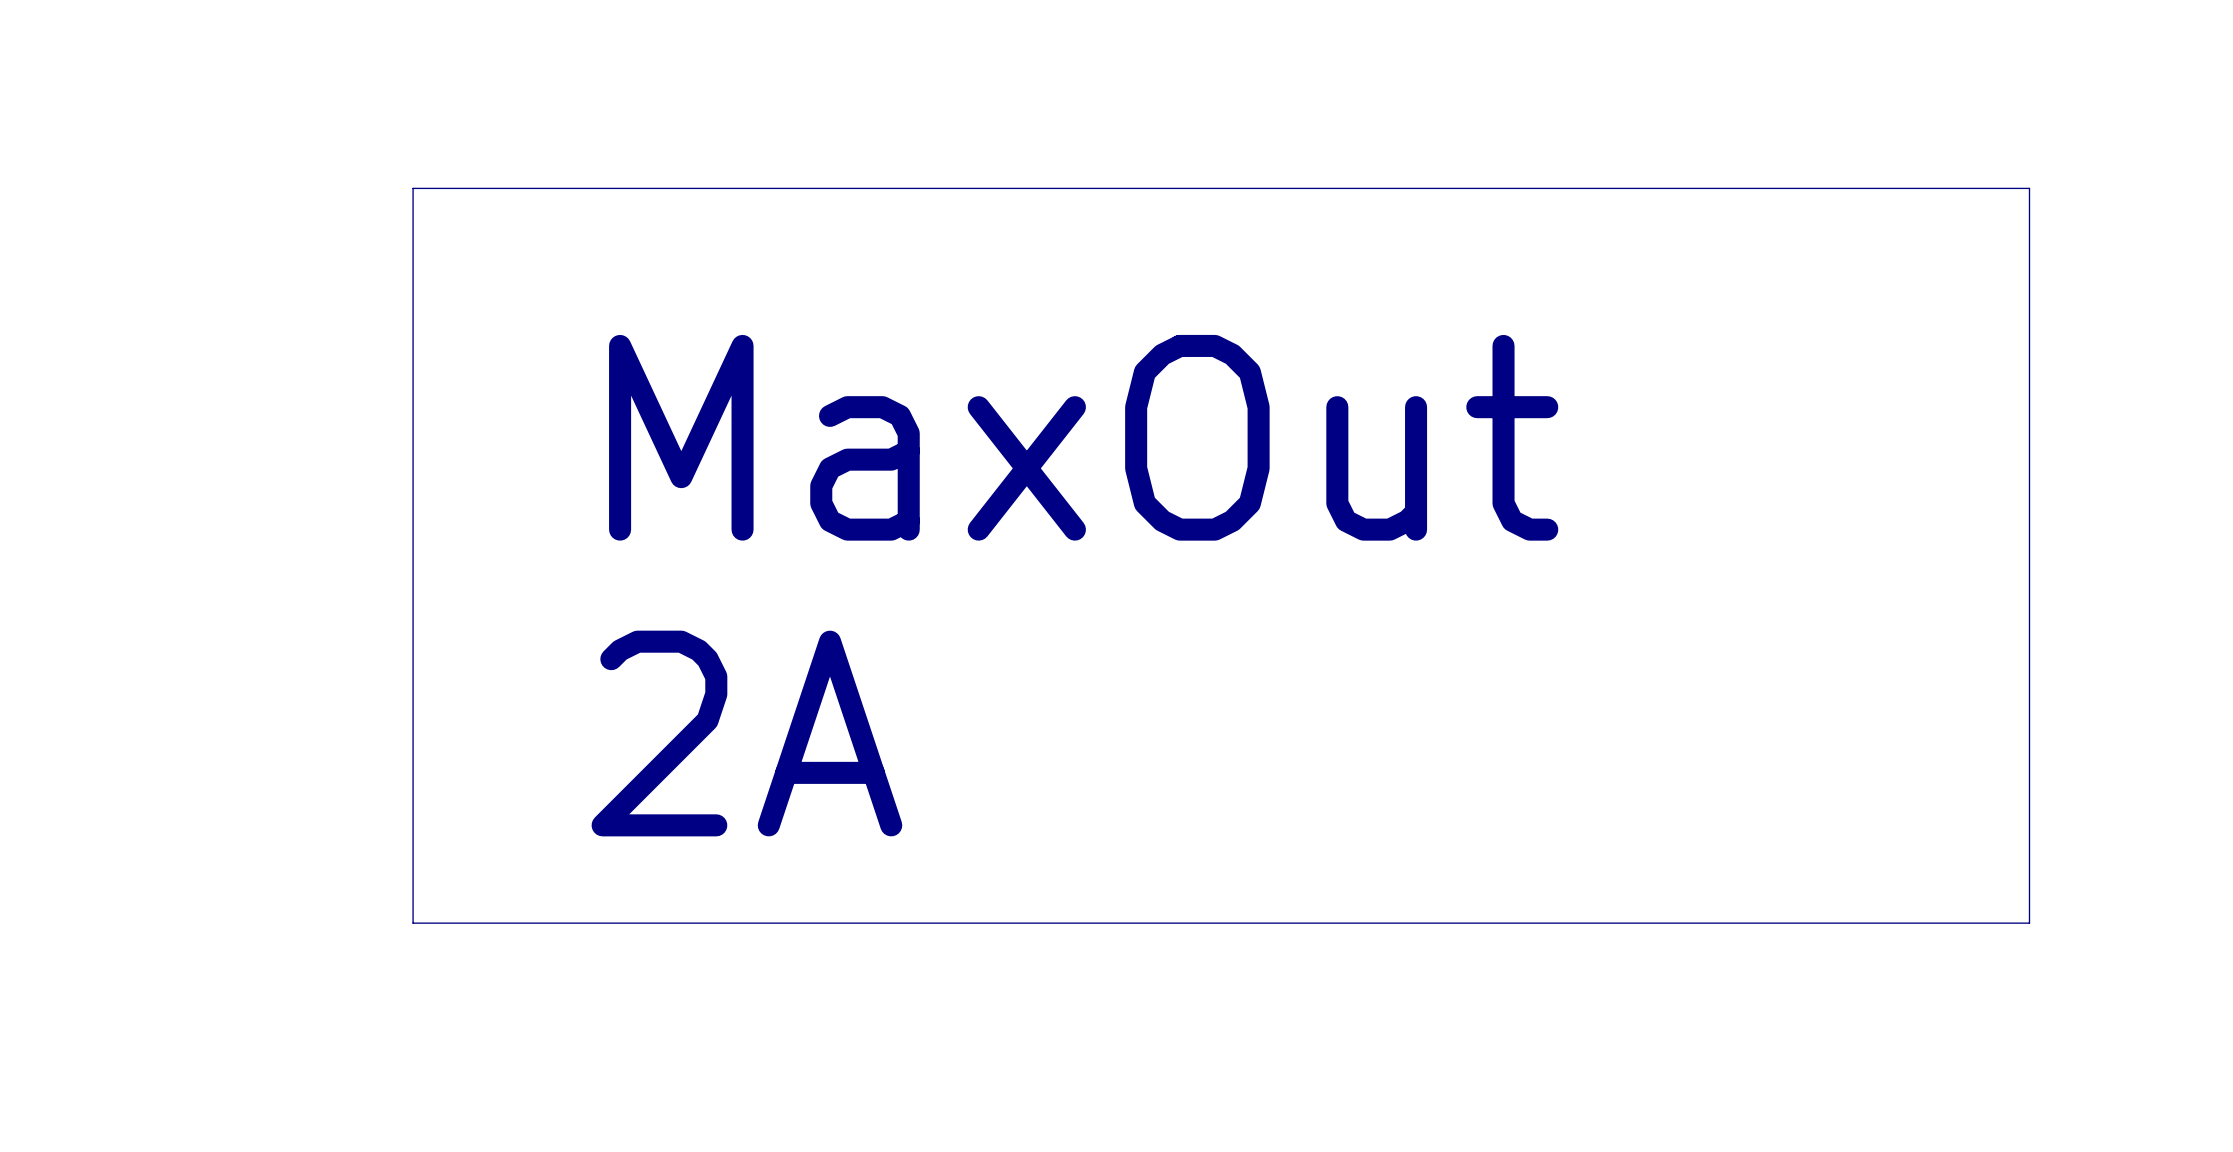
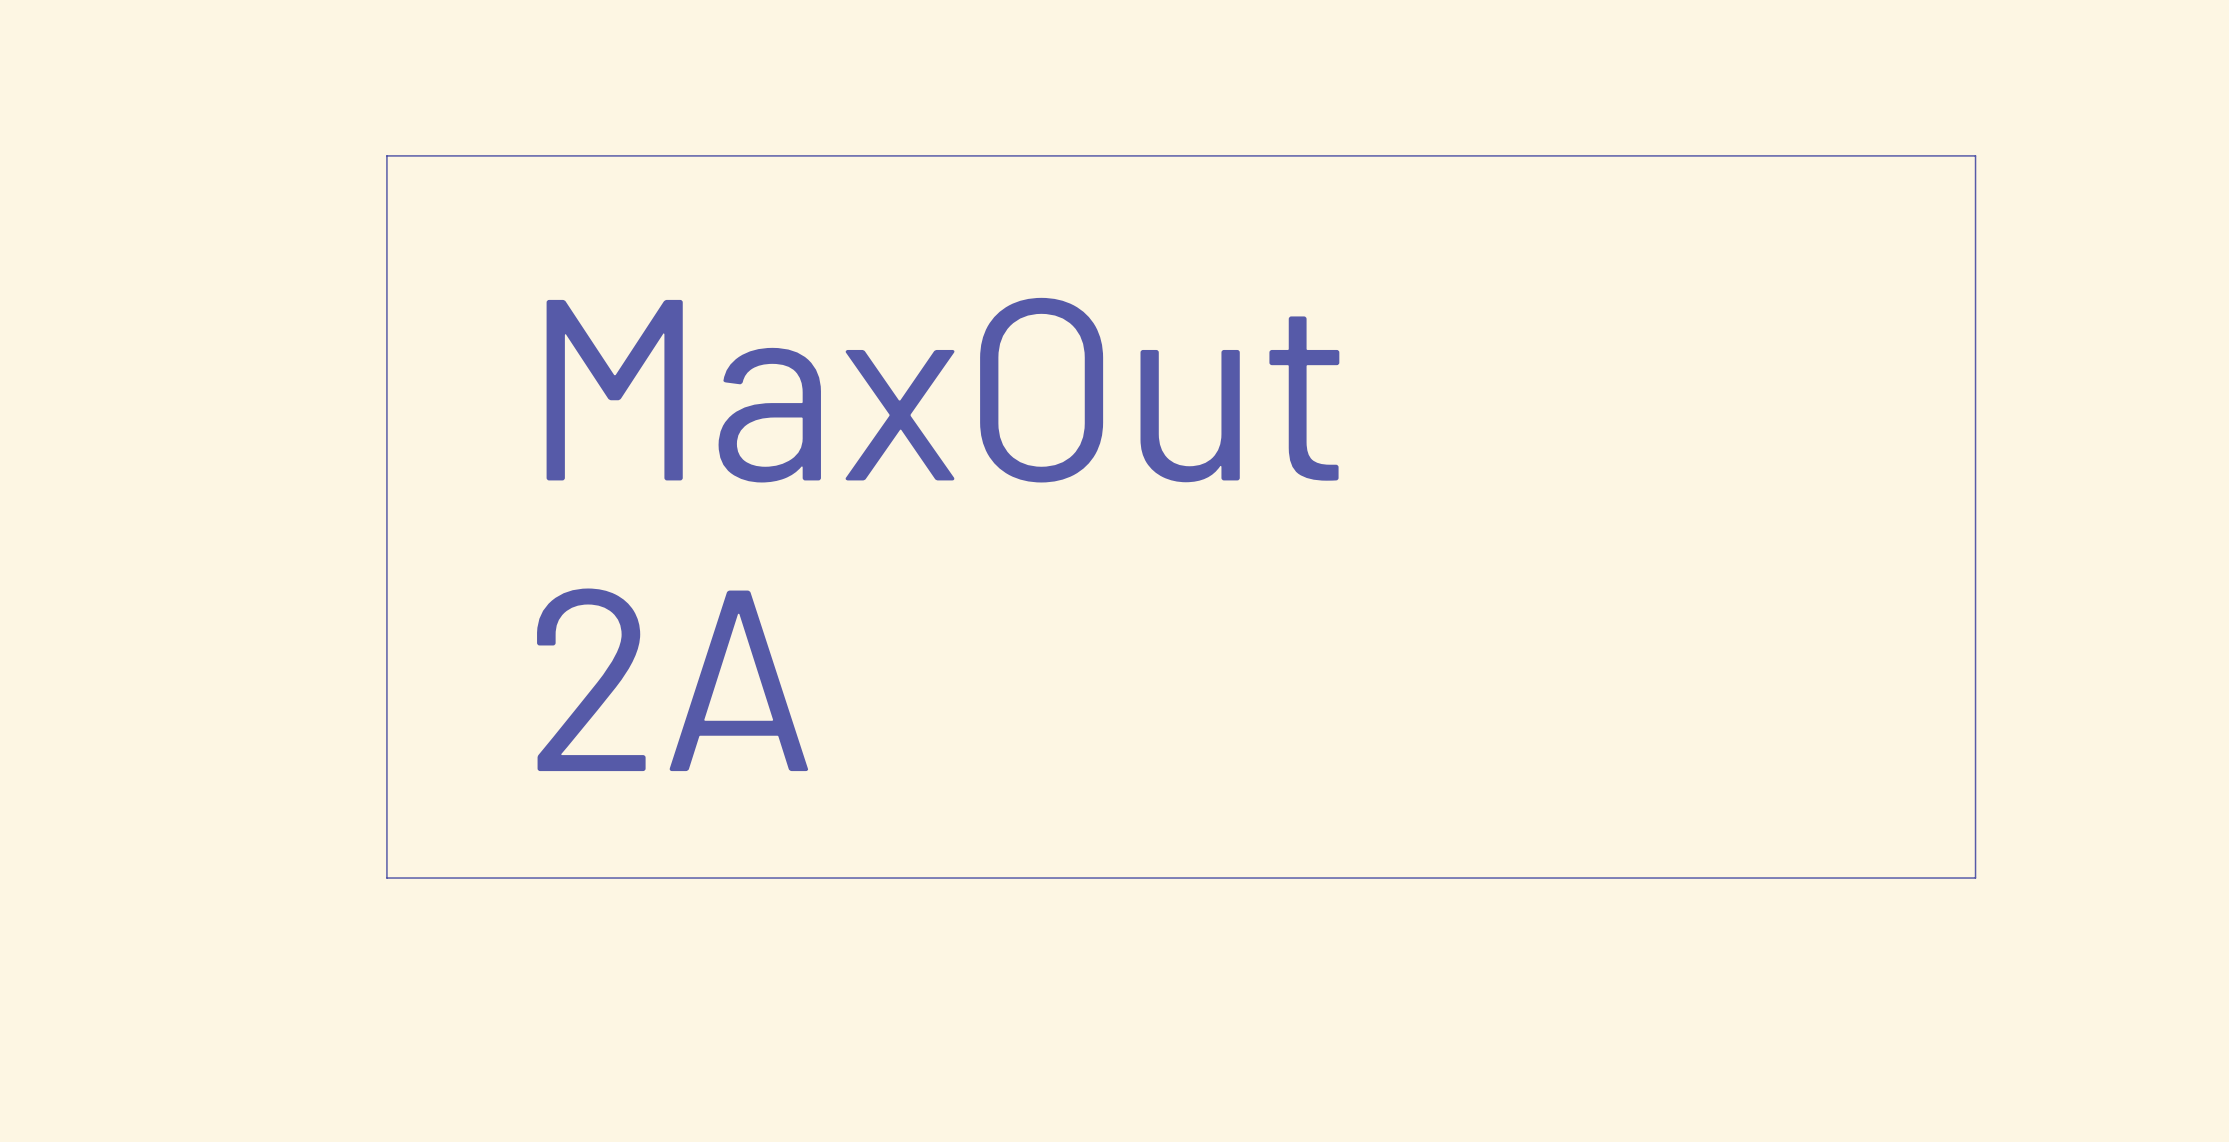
text position: MaxOut (1083, 437) -> MaxOut (942, 390)
text position: 2A (746, 733) -> 2A (672, 679)

